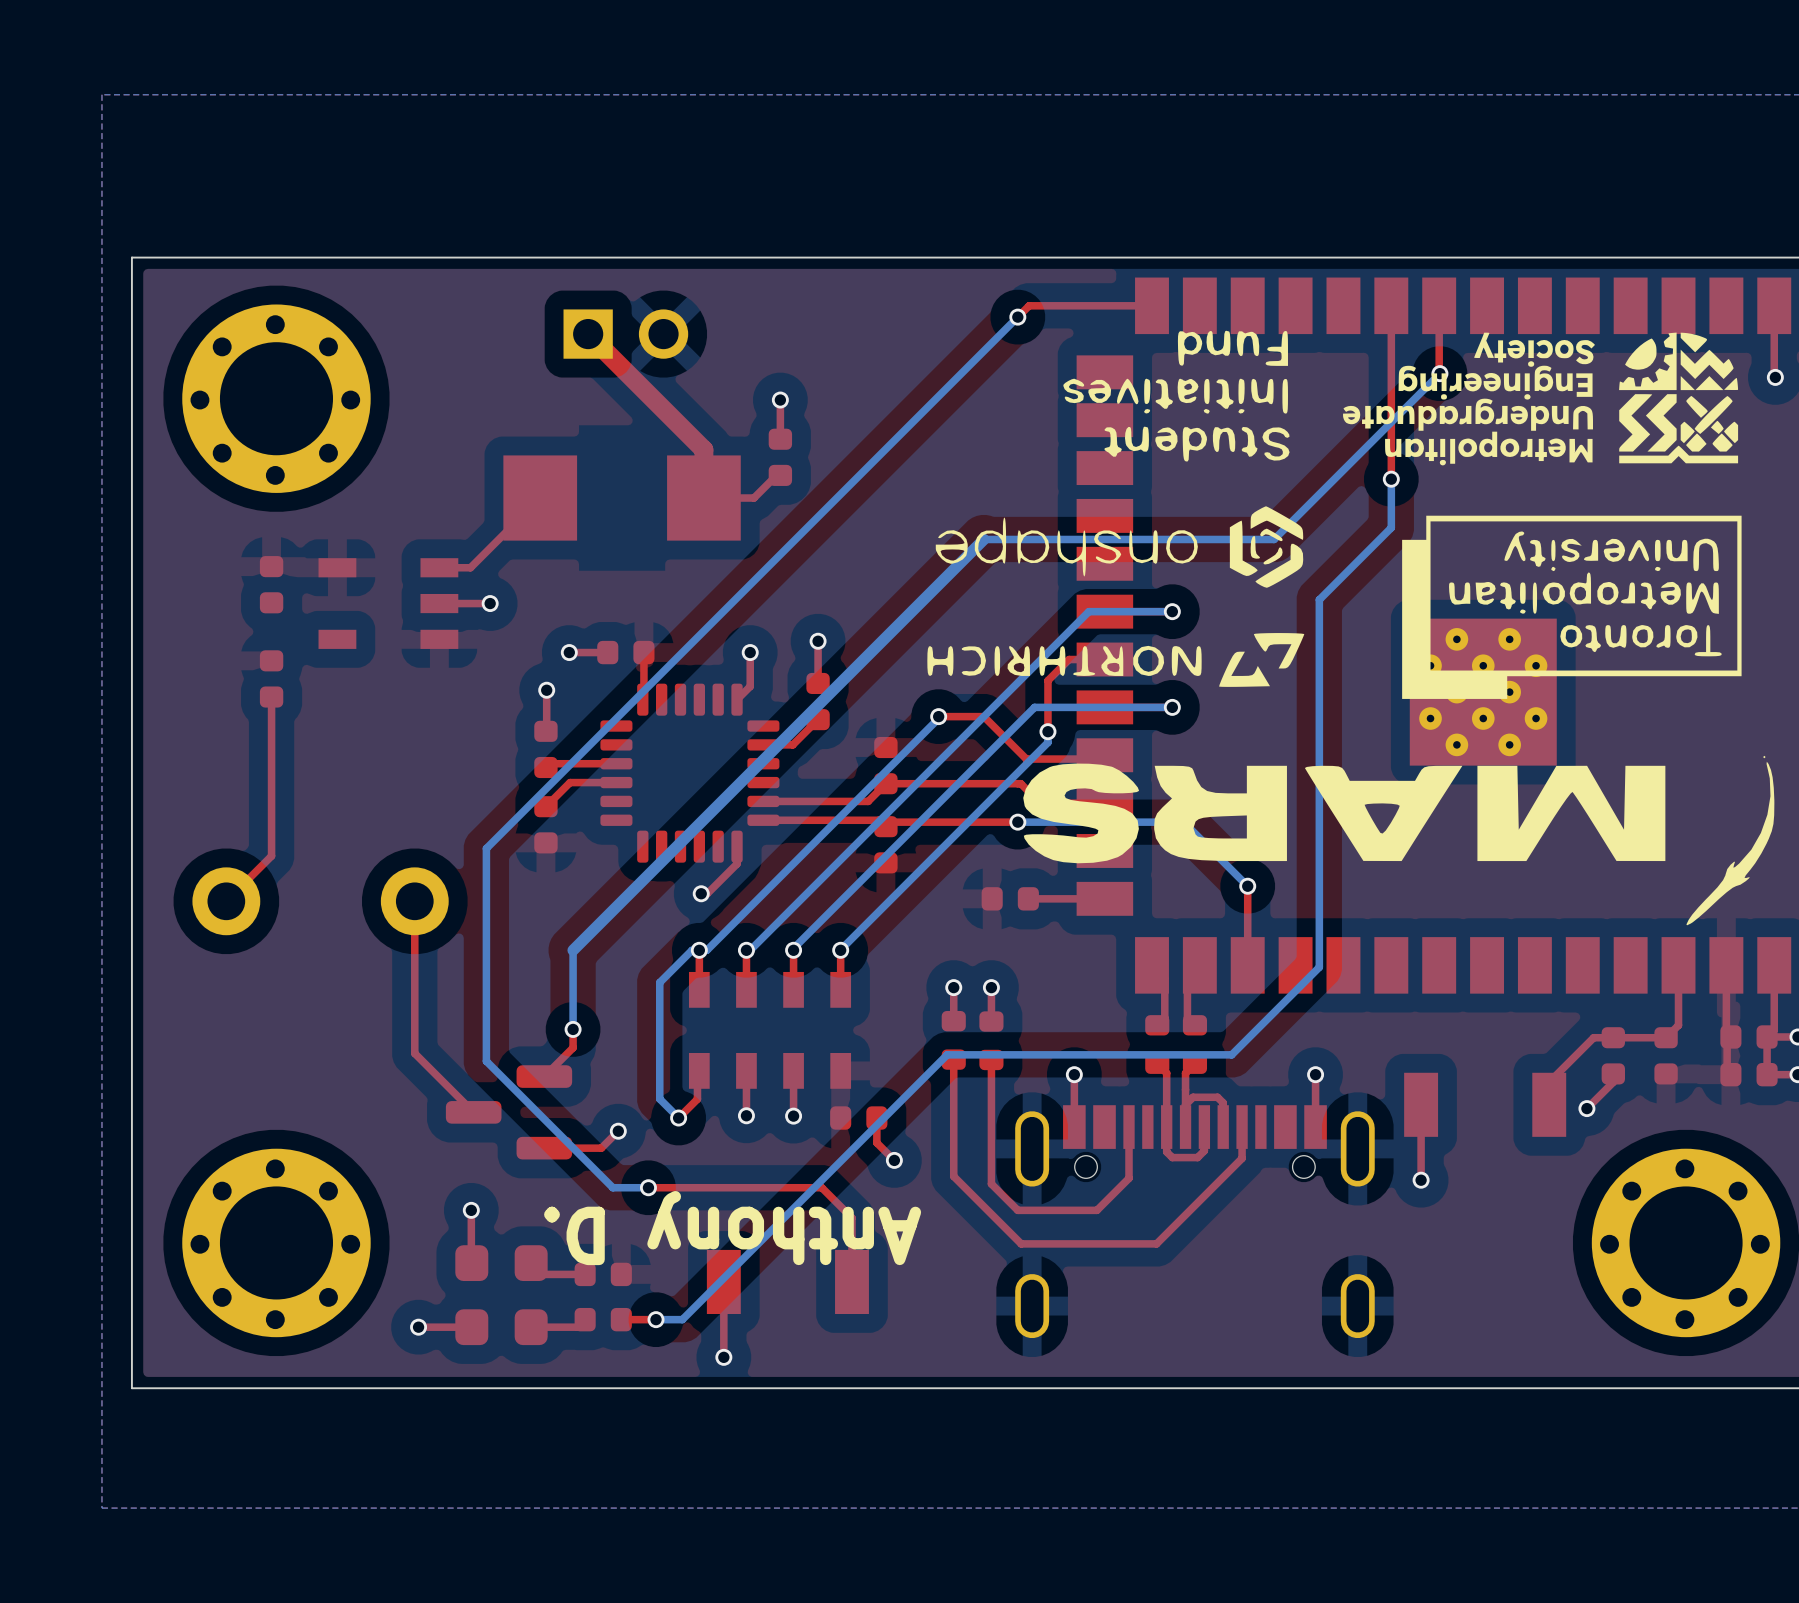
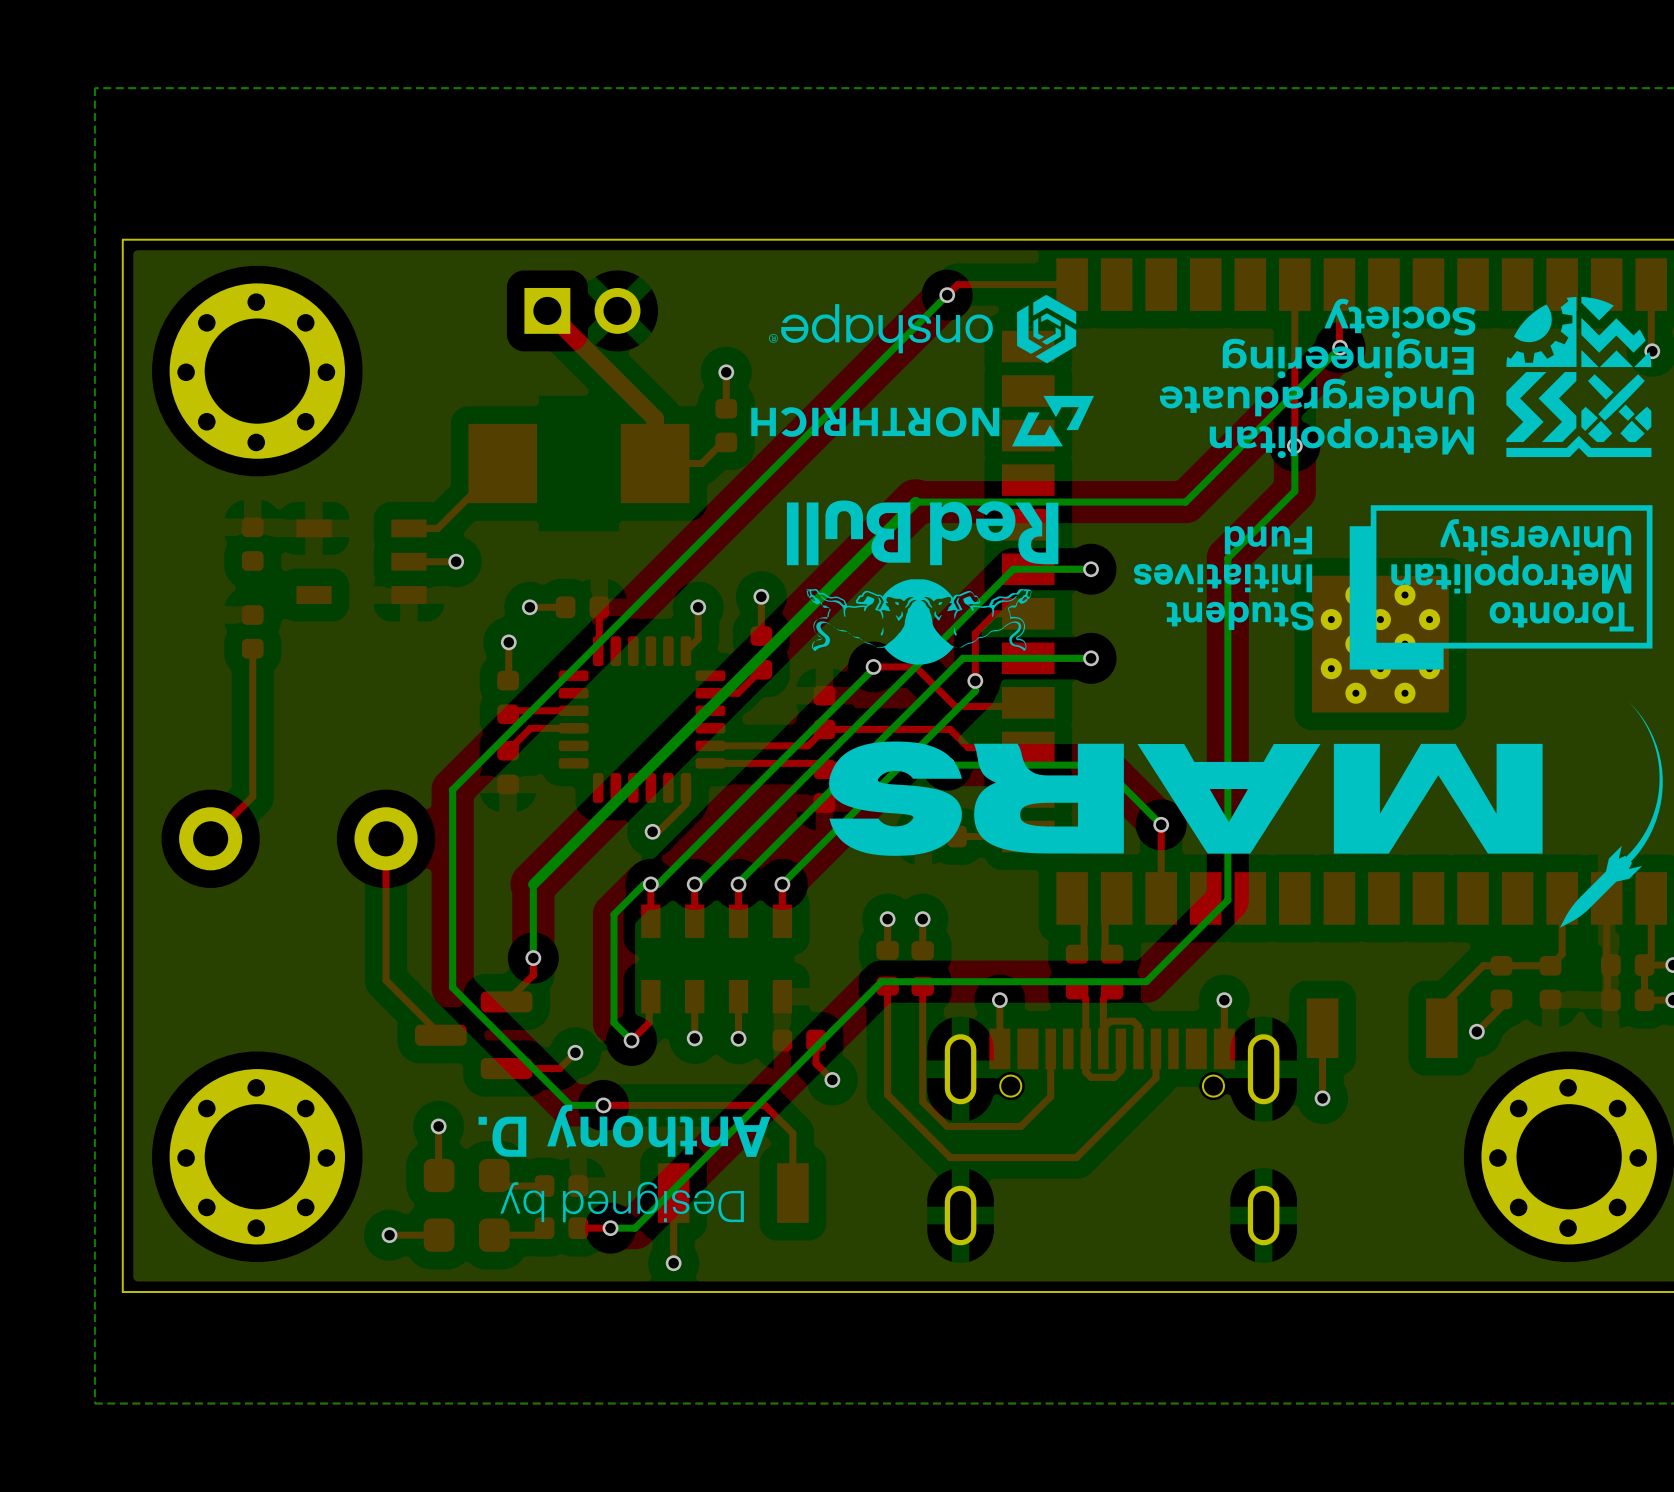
drawing: none -> [751, 295, 1095, 447]
drawing: none -> [1159, 296, 1652, 459]
drawing: [935, 330, 1304, 588] -> none
drawing: [1343, 332, 1739, 466] -> none
drawing: [1402, 515, 1742, 699] -> none
drawing: none -> [786, 500, 1059, 665]
drawing: none -> [829, 505, 1663, 928]
drawing: [927, 633, 1305, 687] -> none
drawing: [1023, 755, 1775, 926] -> none
drawing: none -> [478, 1104, 771, 1223]
text: Anthony D. (732, 1228) -> none

